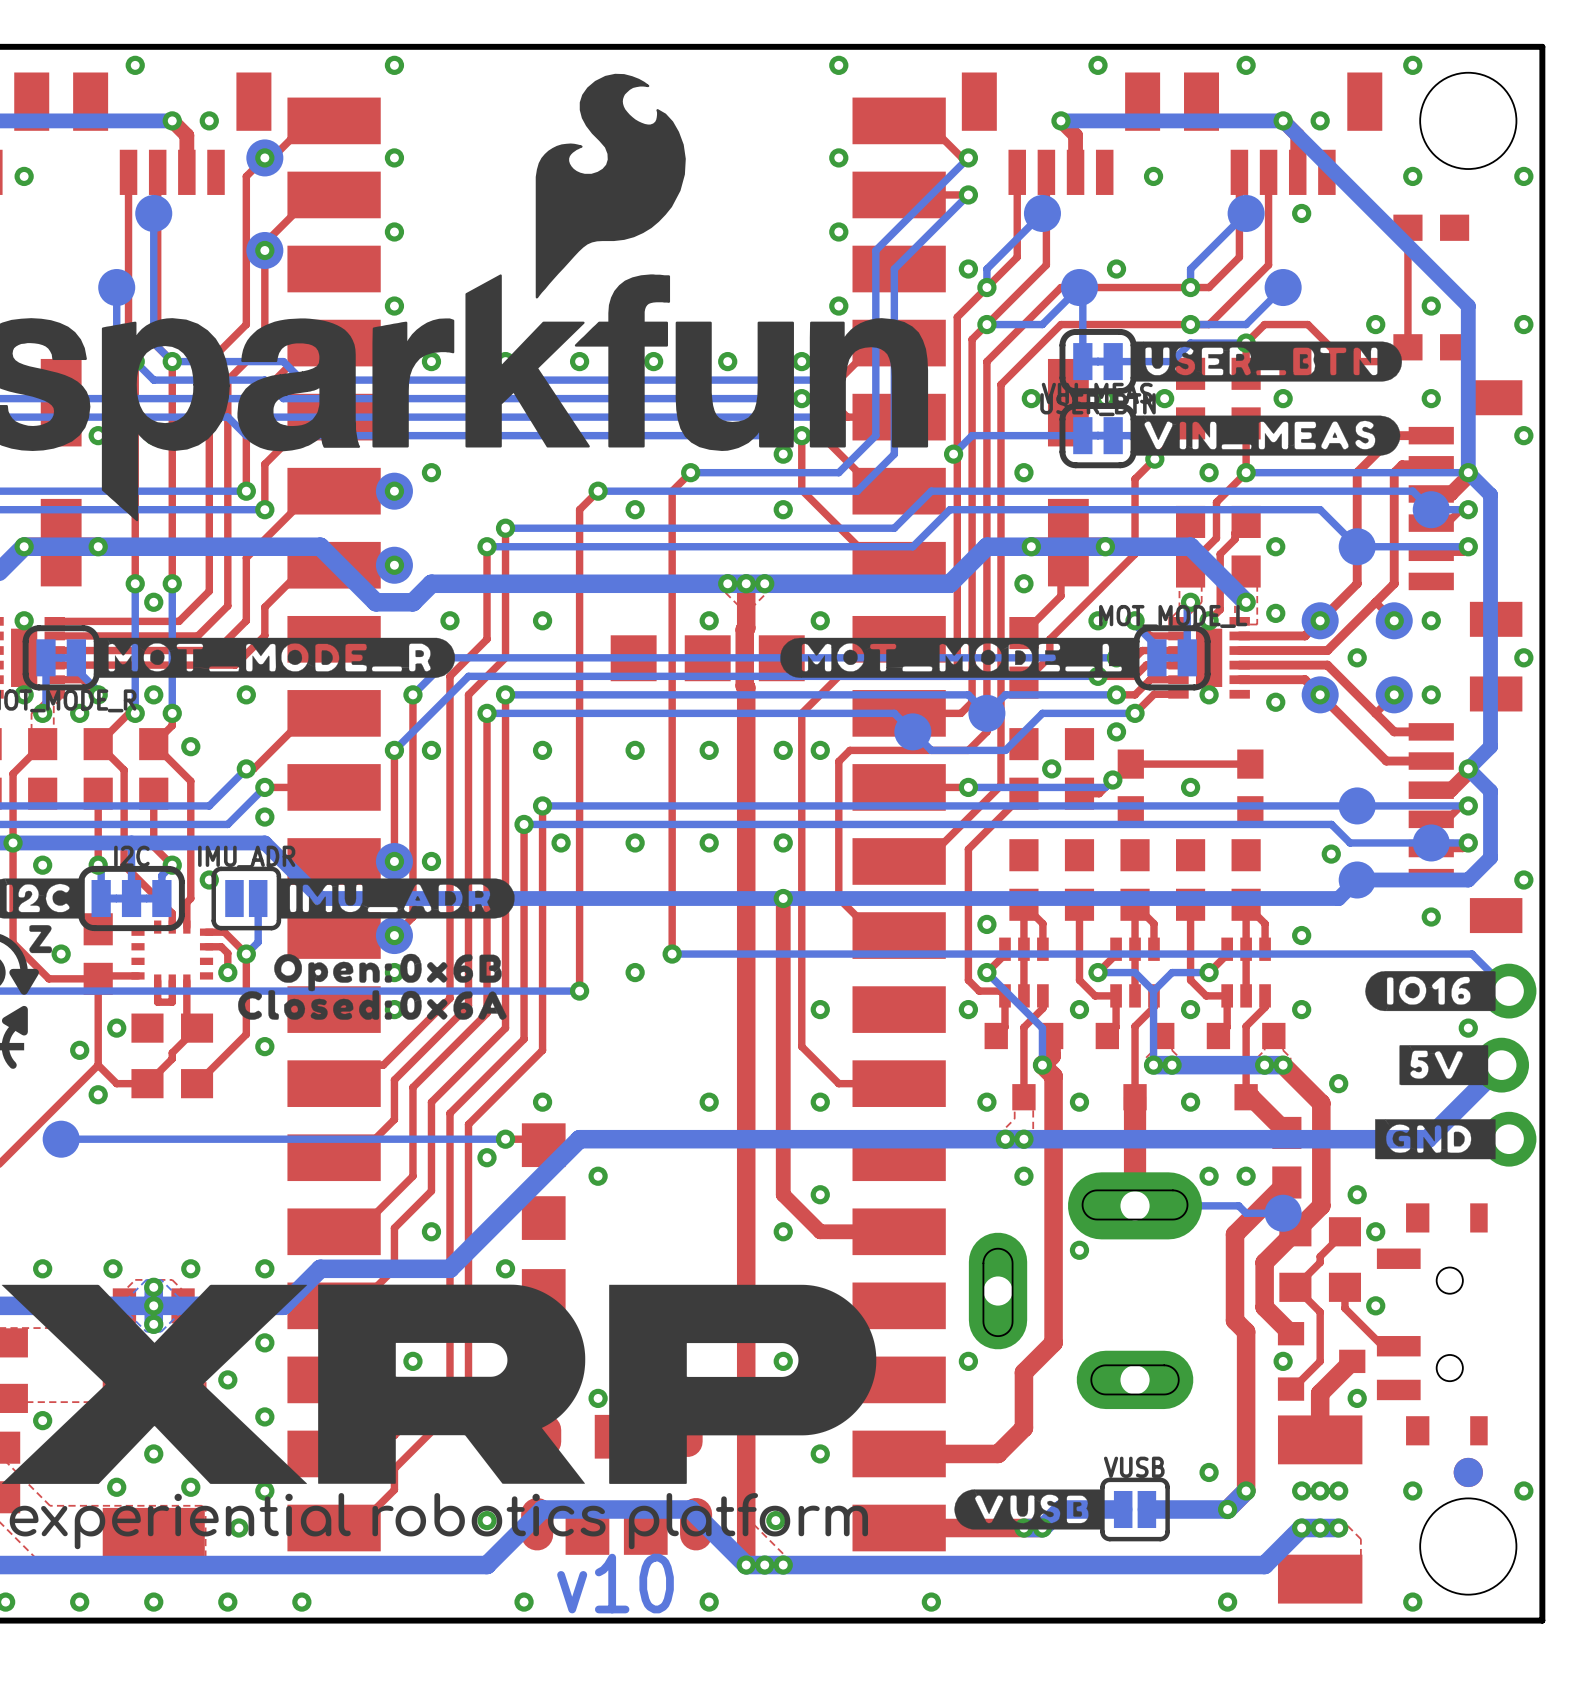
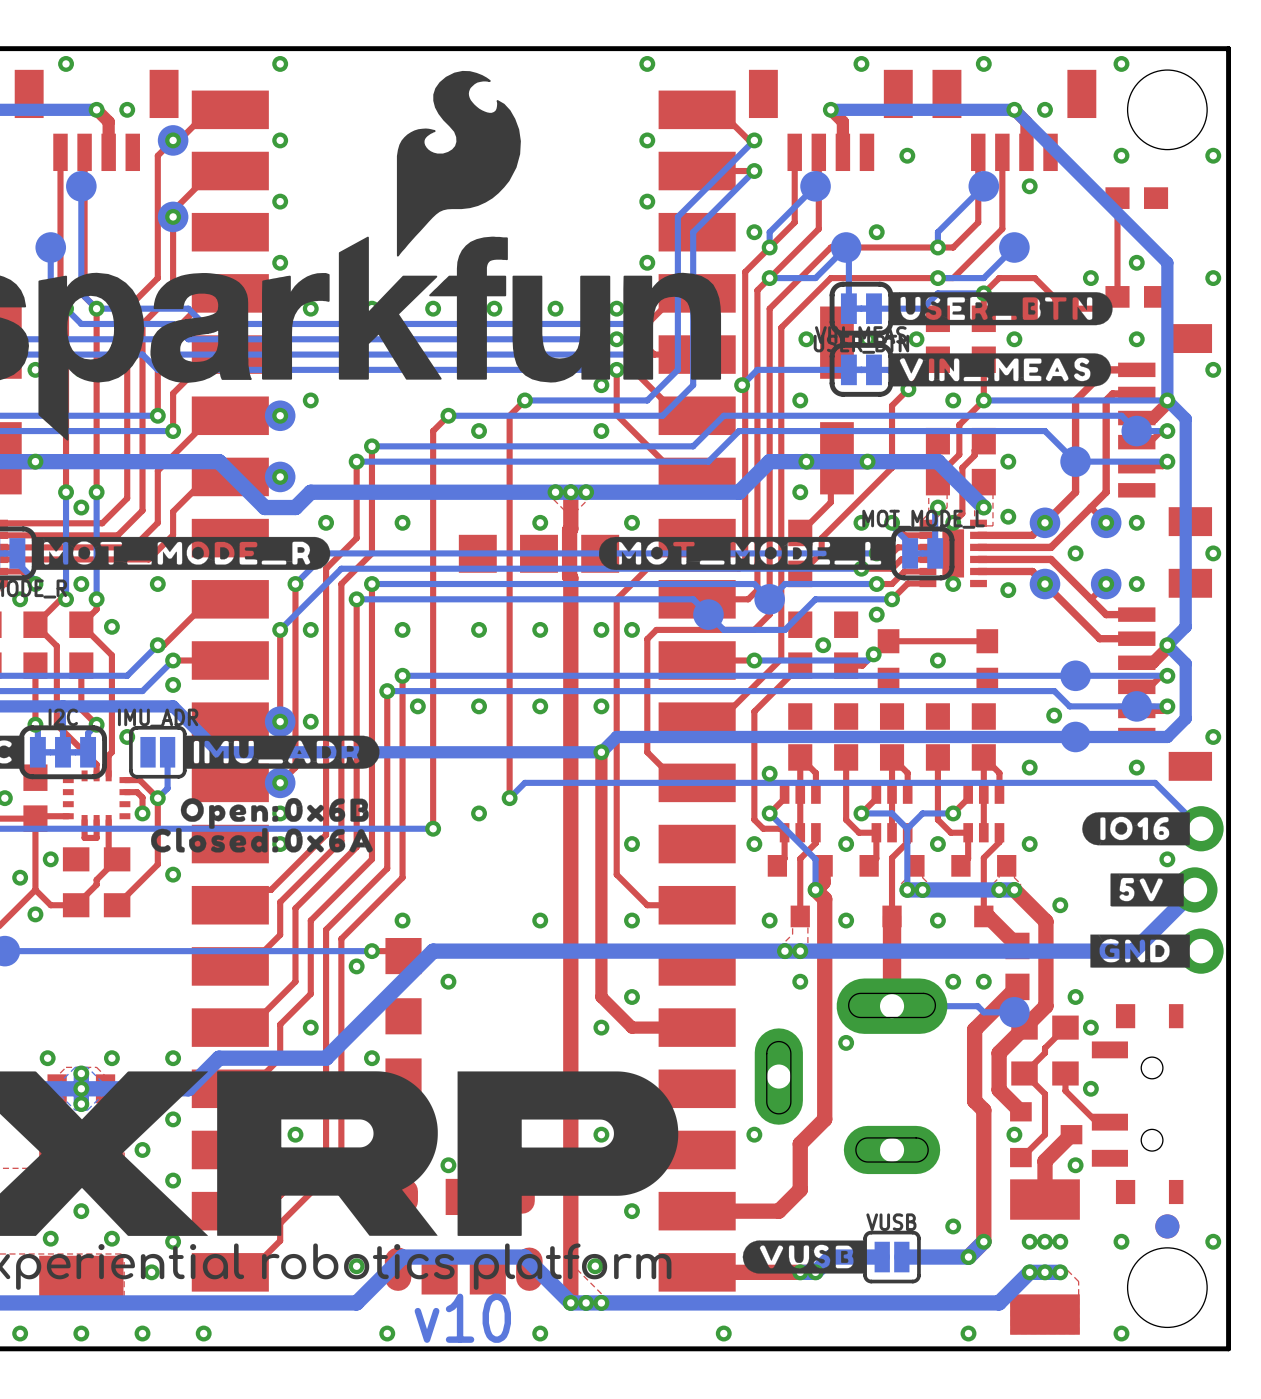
bottom track: (1357, 880) (1338, 898) (783, 898) -> (1075, 736) (616, 736) (601, 752)
via position: (1301, 935) -> (1029, 767)
bottom track: (1472, 954) (672, 954) -> (1170, 798) (1155, 782) (524, 782) (509, 798)

